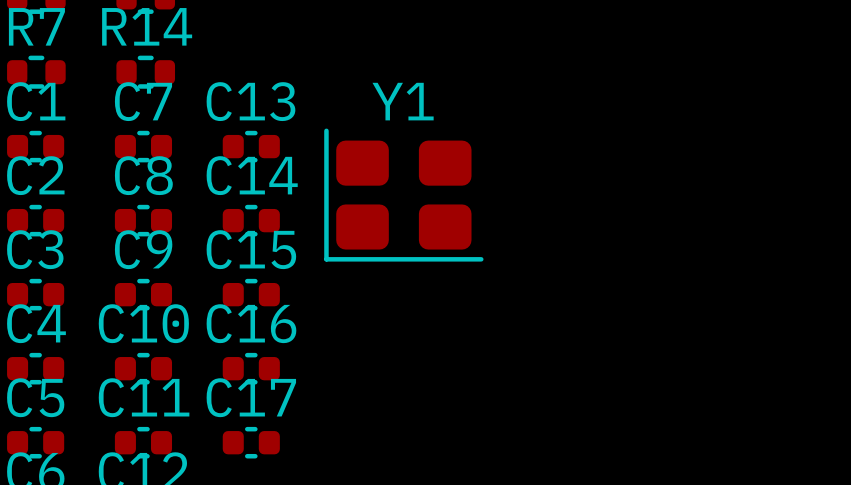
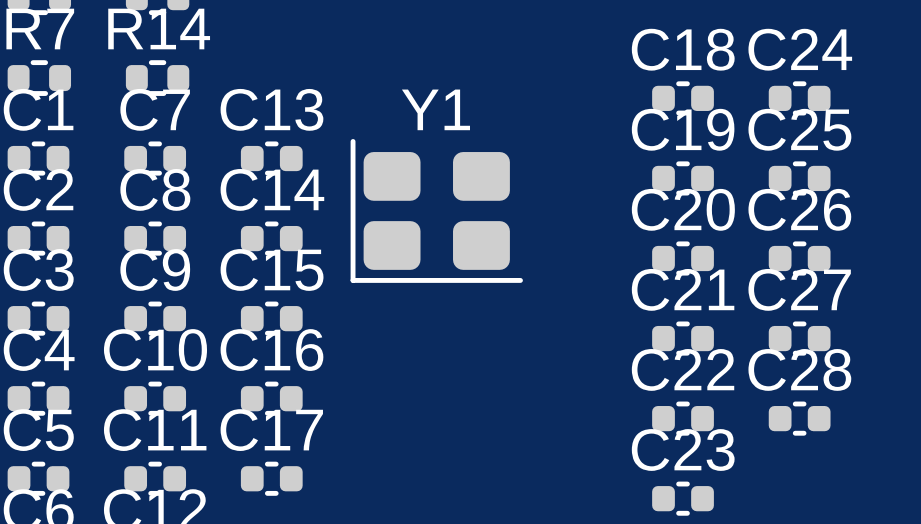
C18: none -> (683, 98)
C24: none -> (799, 98)
C19: none -> (683, 178)
C25: none -> (799, 178)
C20: none -> (683, 258)
C26: none -> (799, 258)
C21: none -> (683, 338)
C27: none -> (799, 338)
C22: none -> (683, 418)
C28: none -> (799, 418)
C23: none -> (683, 498)

